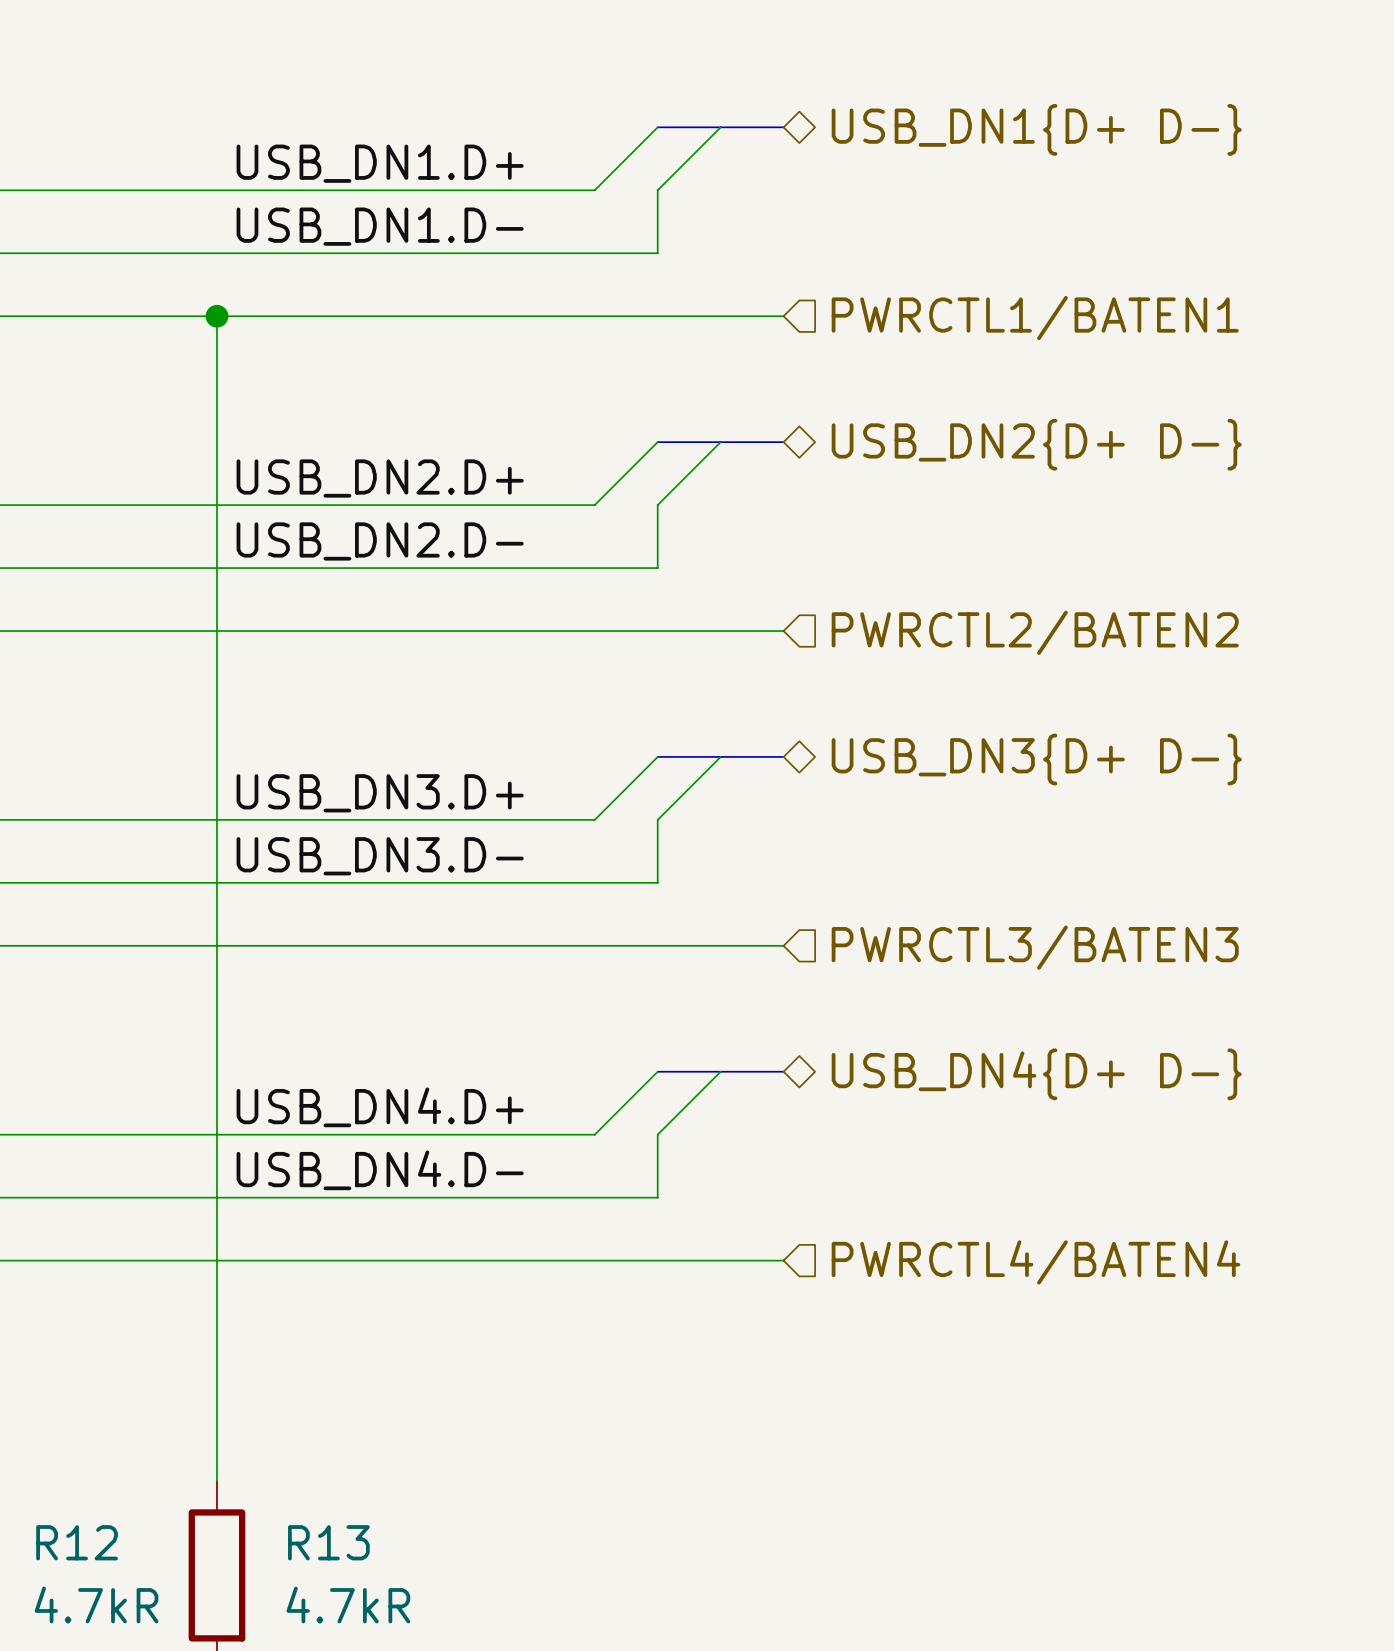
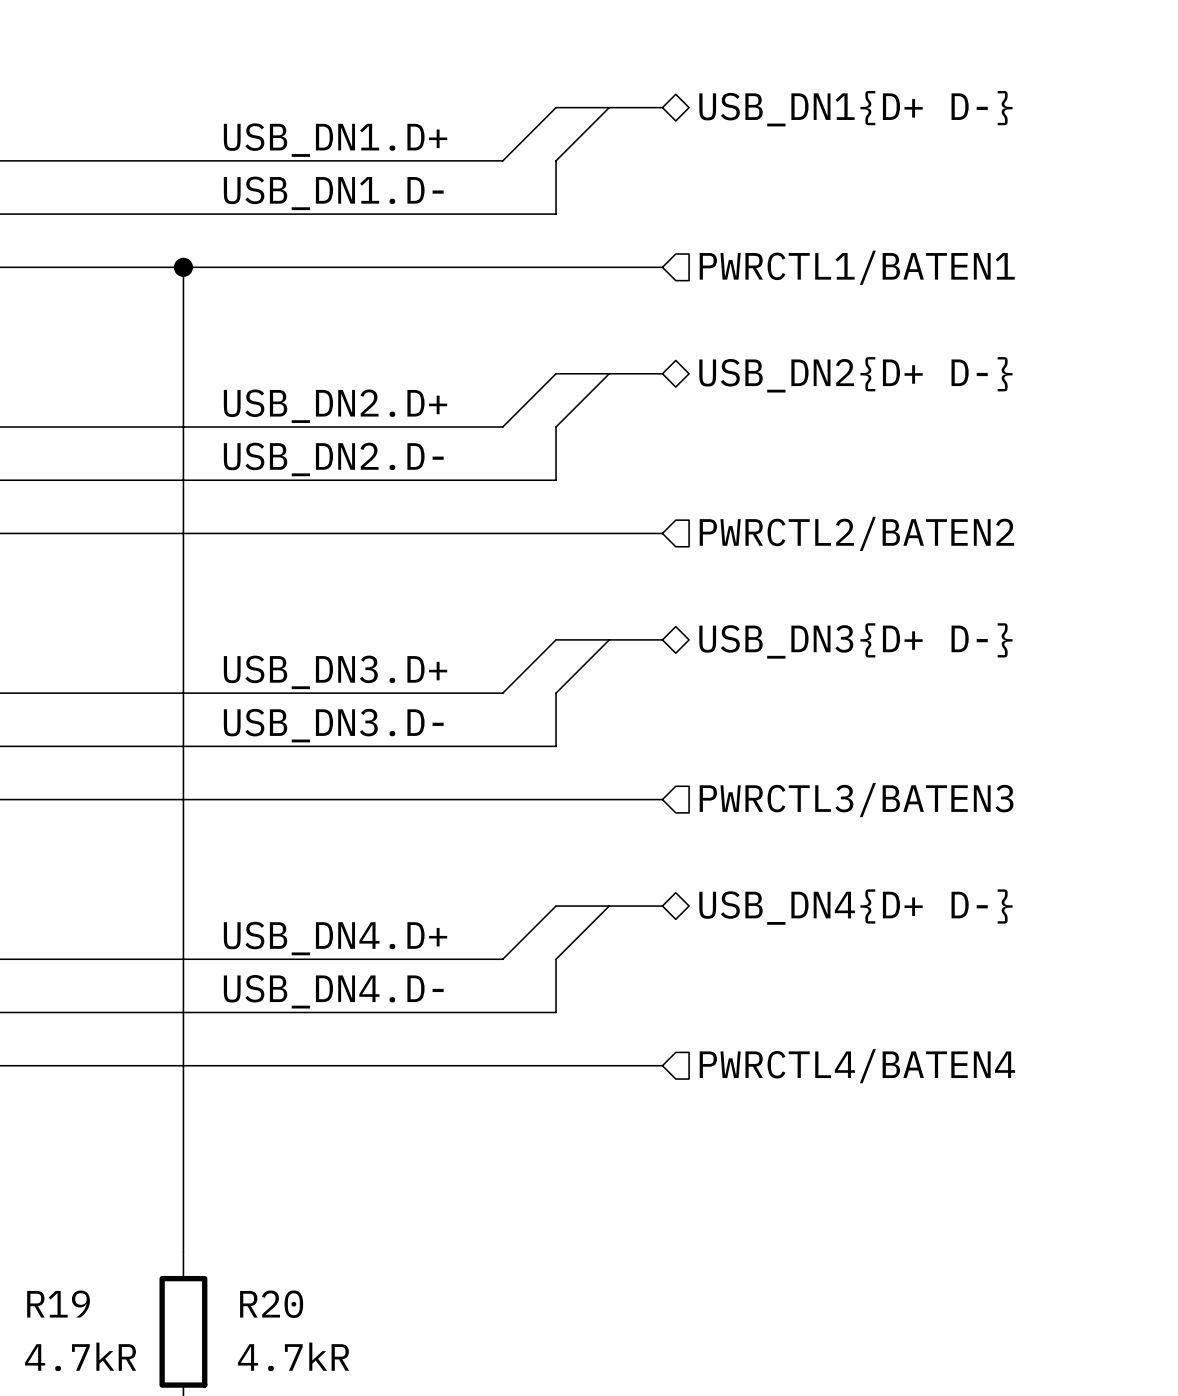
R12 name: R12 (77, 1542) -> R19 (58, 1304)
R13 name: R13 (328, 1542) -> R20 (271, 1304)

